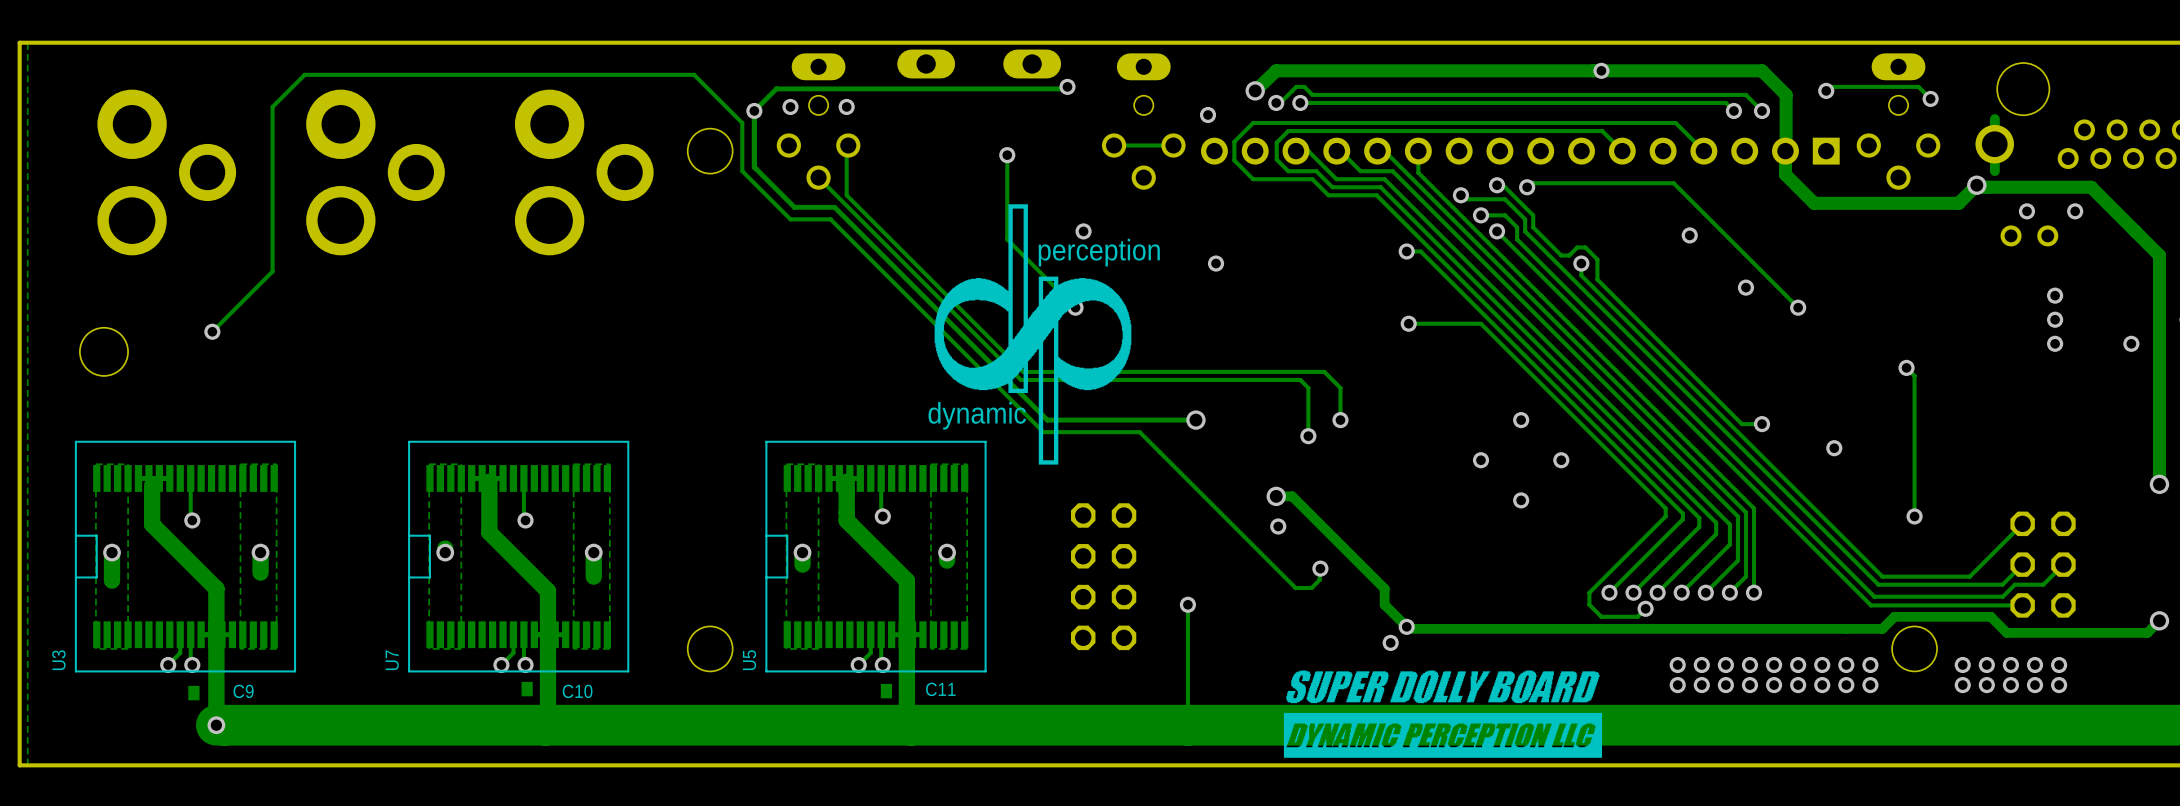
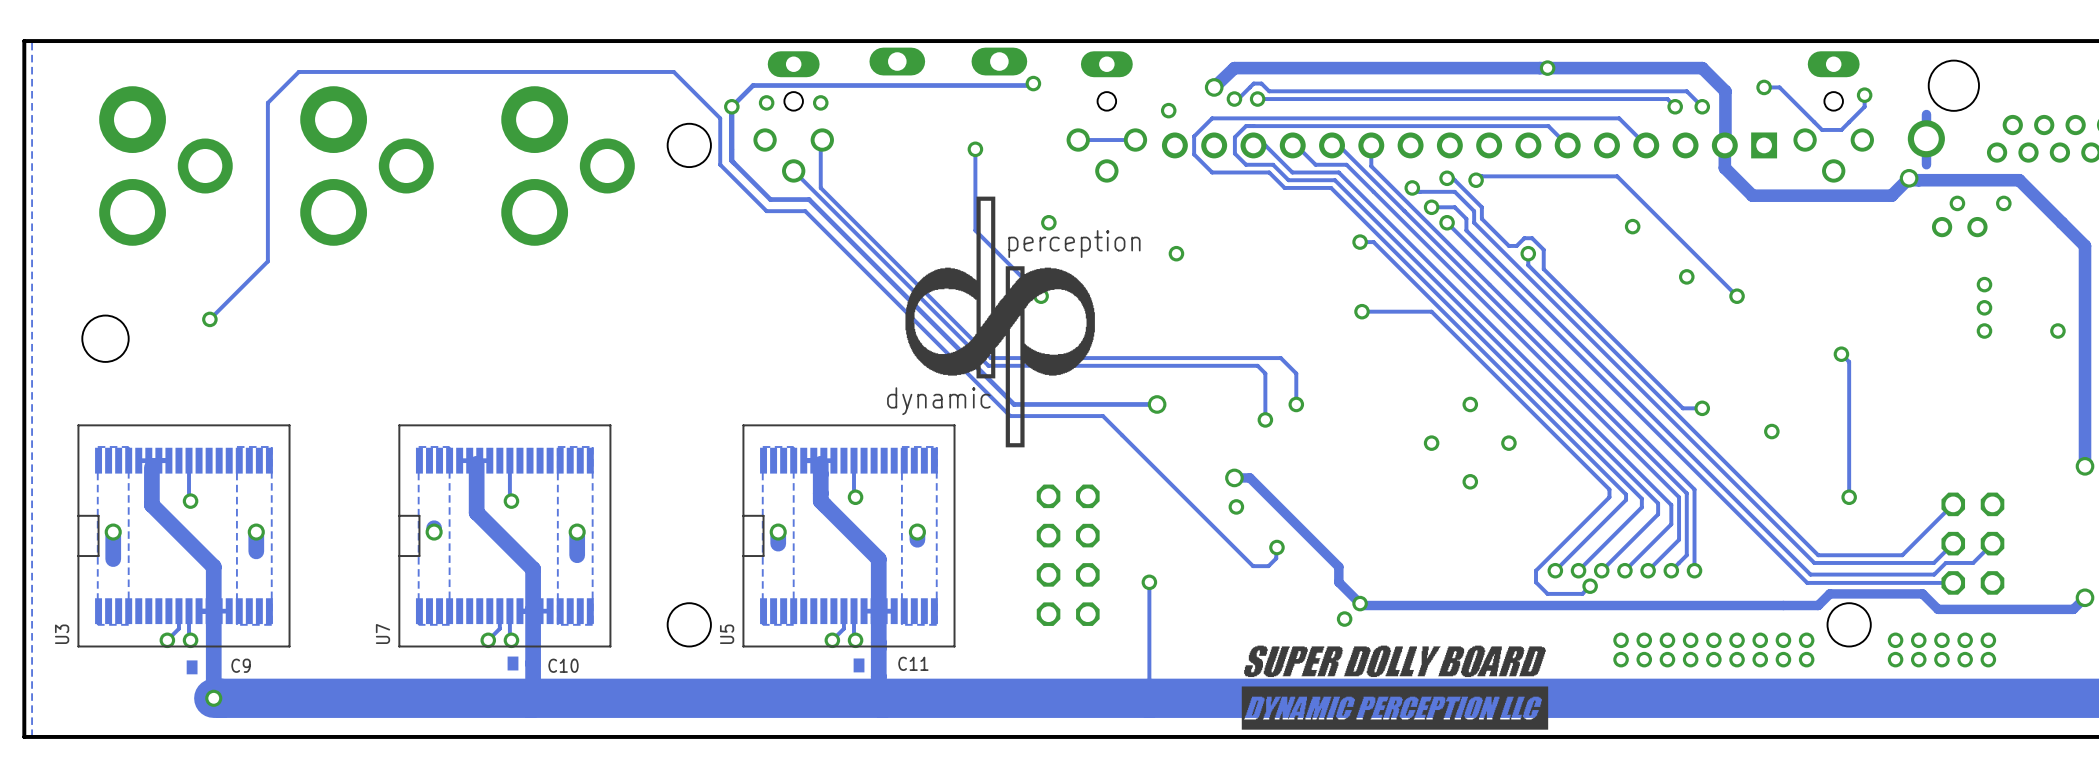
track: (1826, 90) (1830, 86) (1918, 86) (1930, 98) -> (1764, 87) (1779, 87) (1822, 129) (1841, 129) (1864, 106) (1864, 95)

